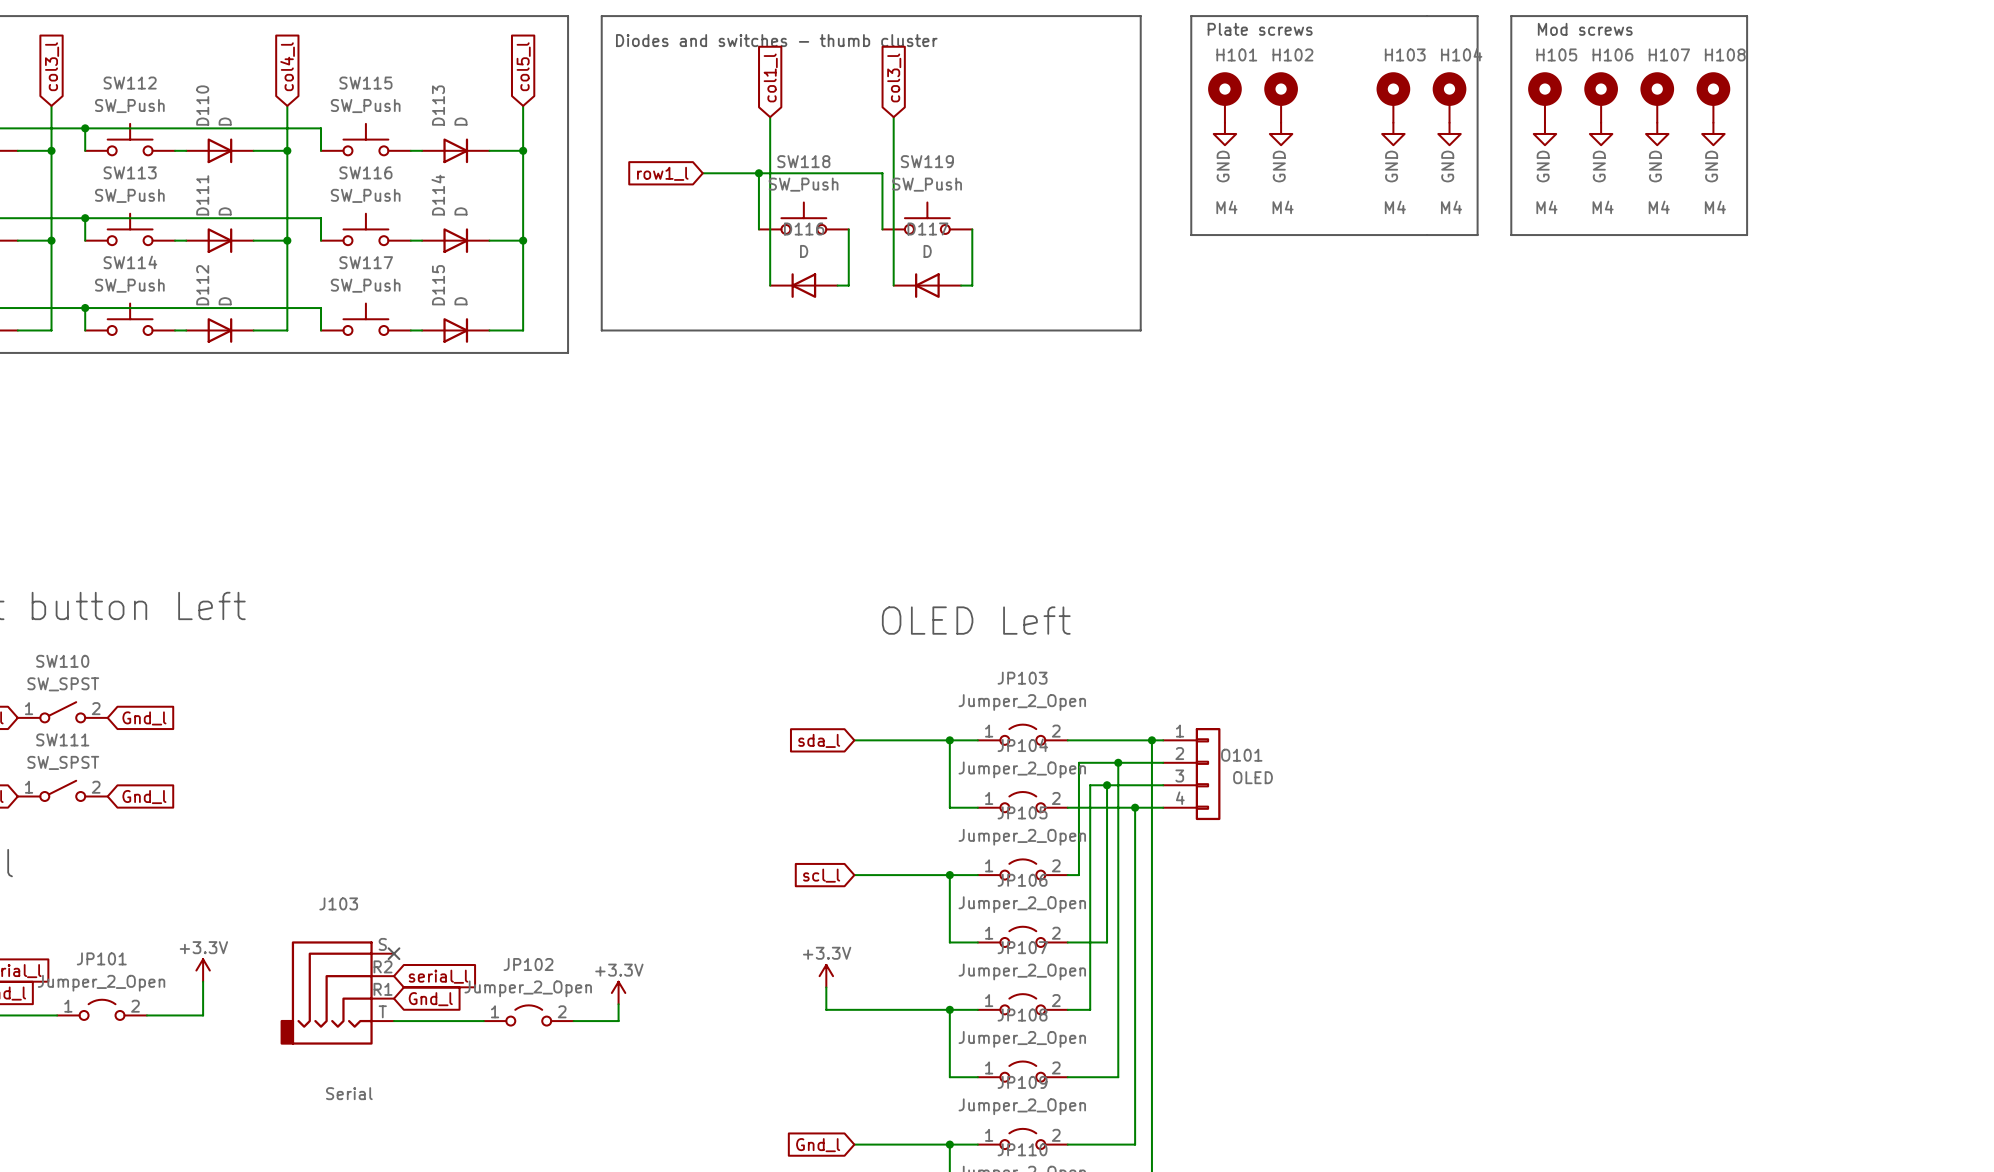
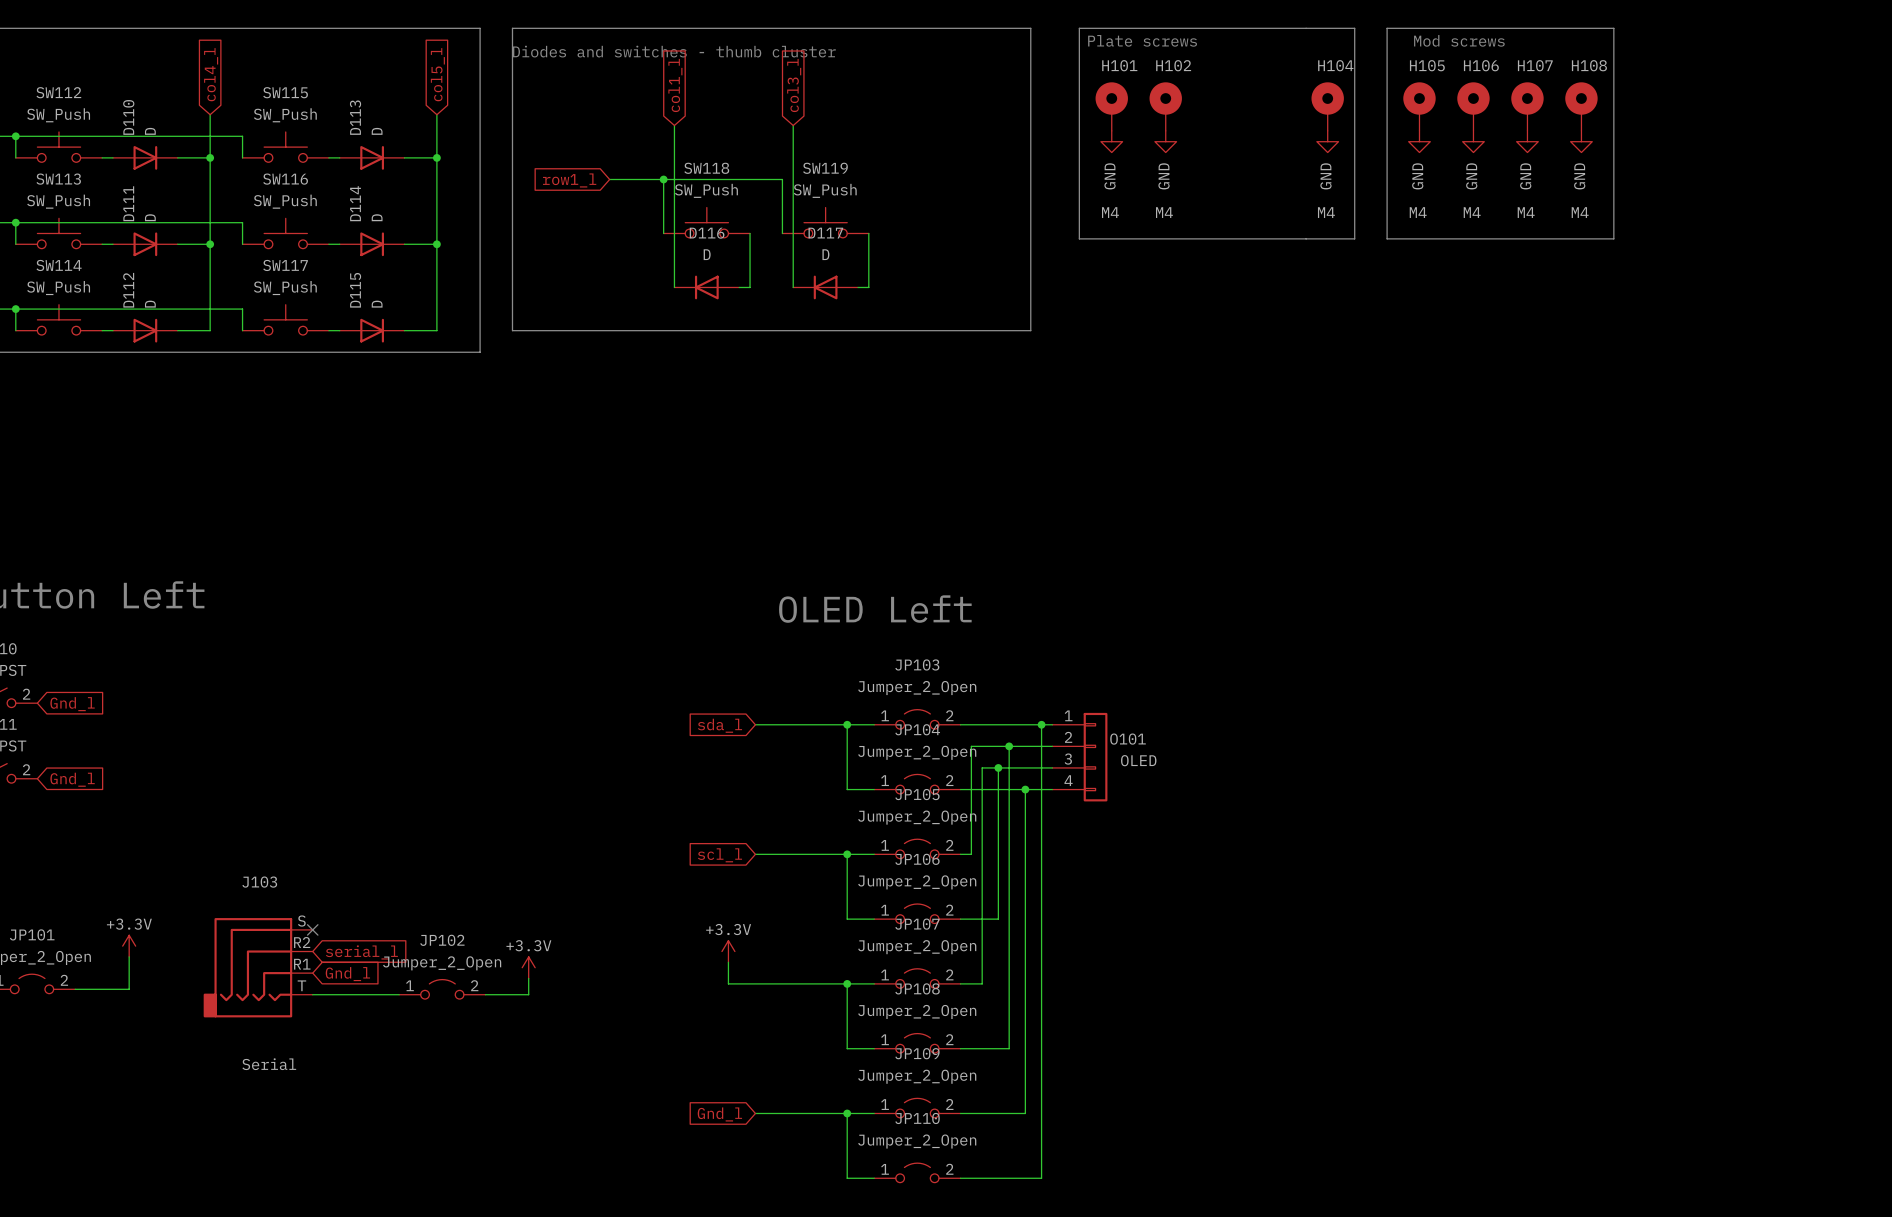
H103: M4 (1393, 97) -> none
power symbol: GND (1393, 133) -> none

